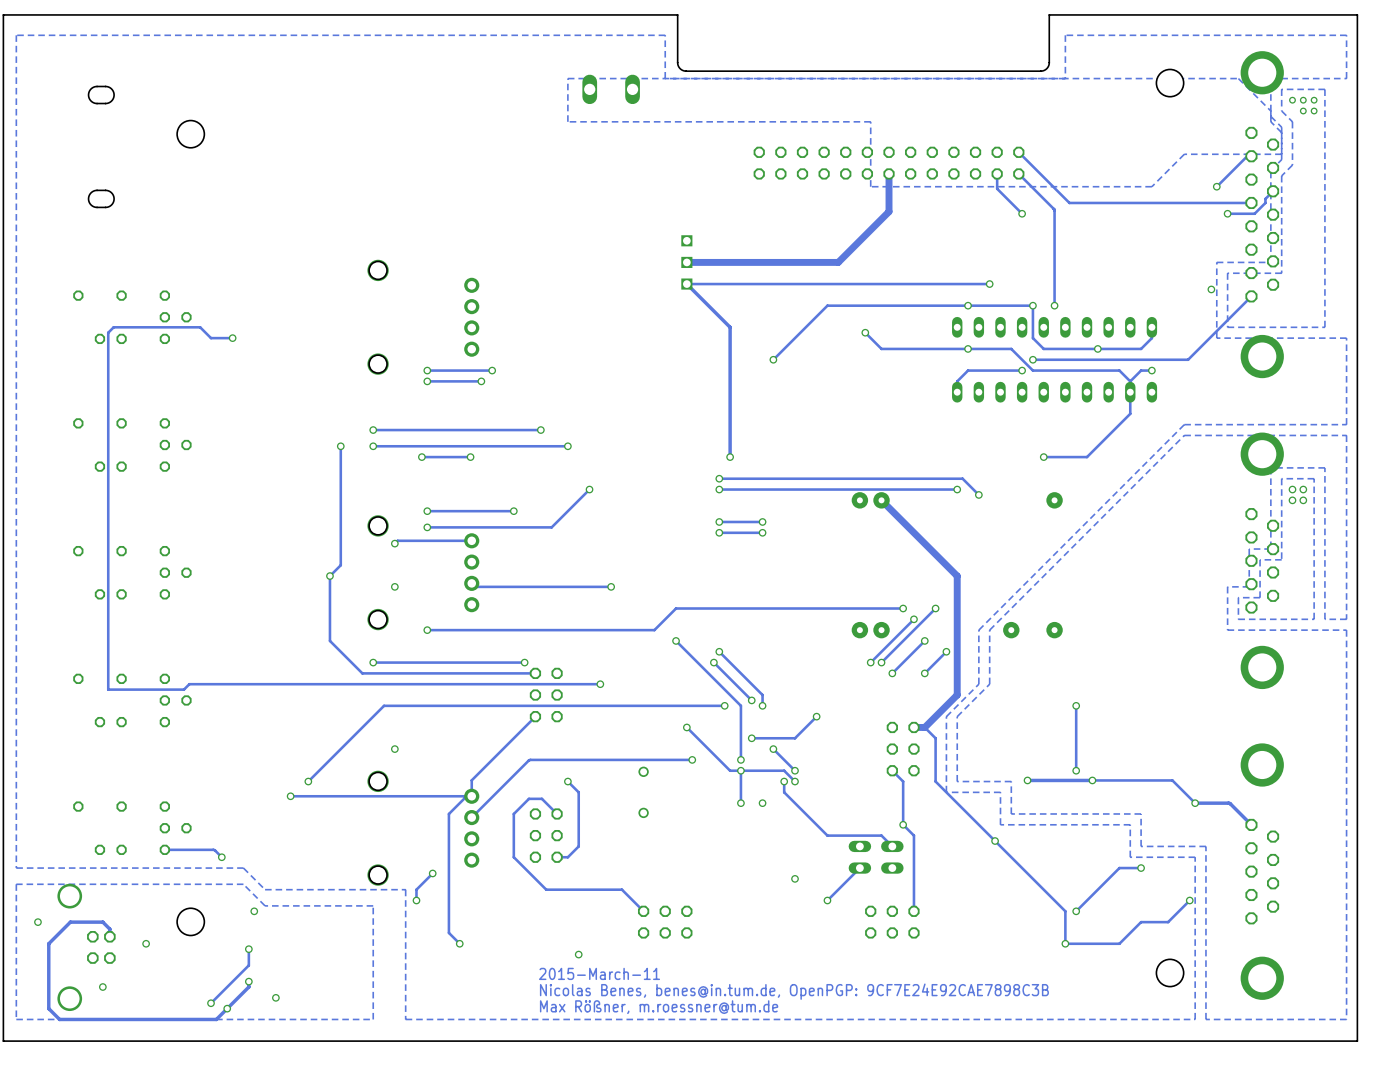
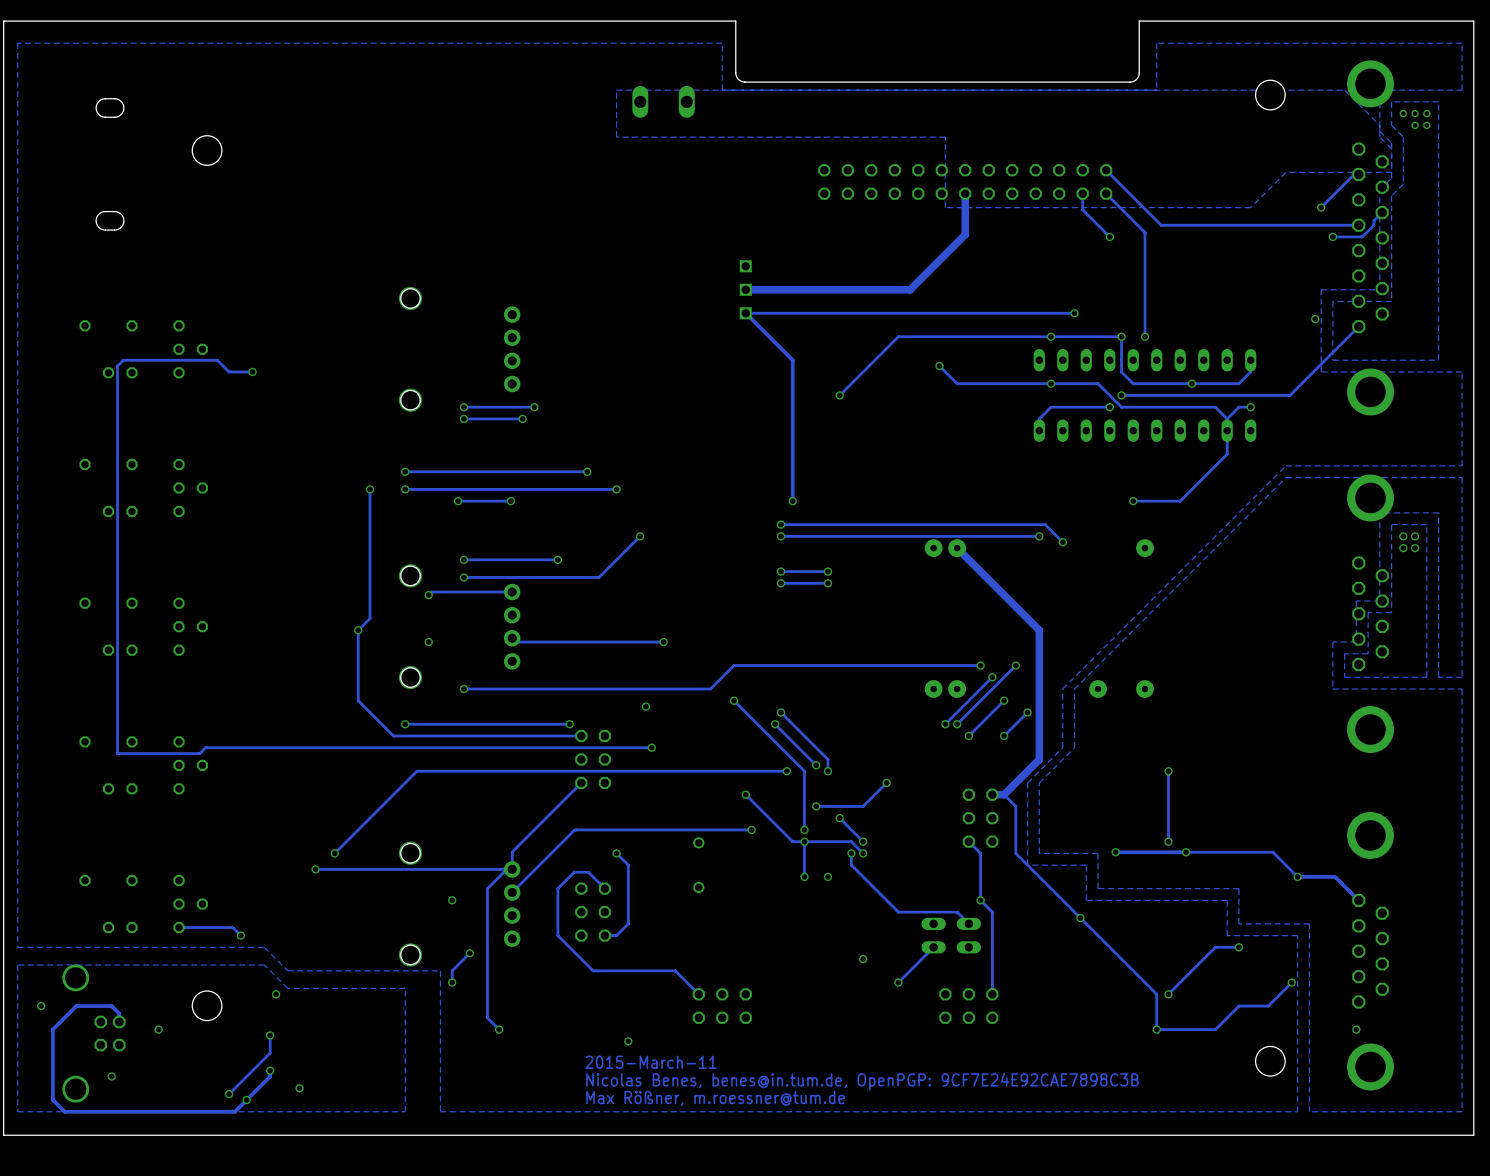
via: none -> (645, 706)
via: (394, 749) -> none
via: none -> (452, 900)
via: none -> (1356, 1029)

